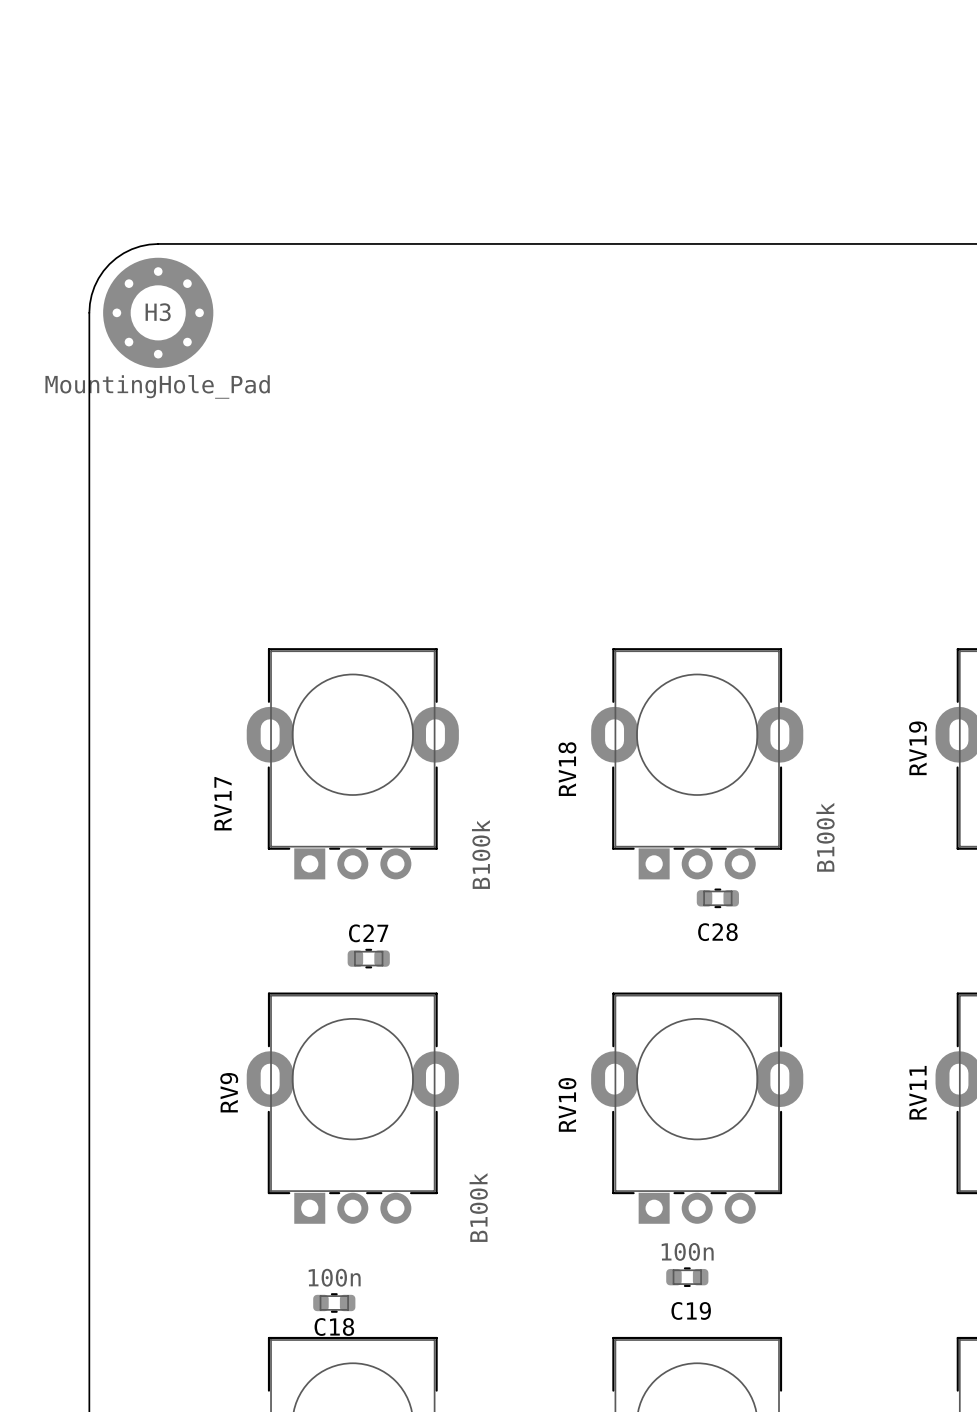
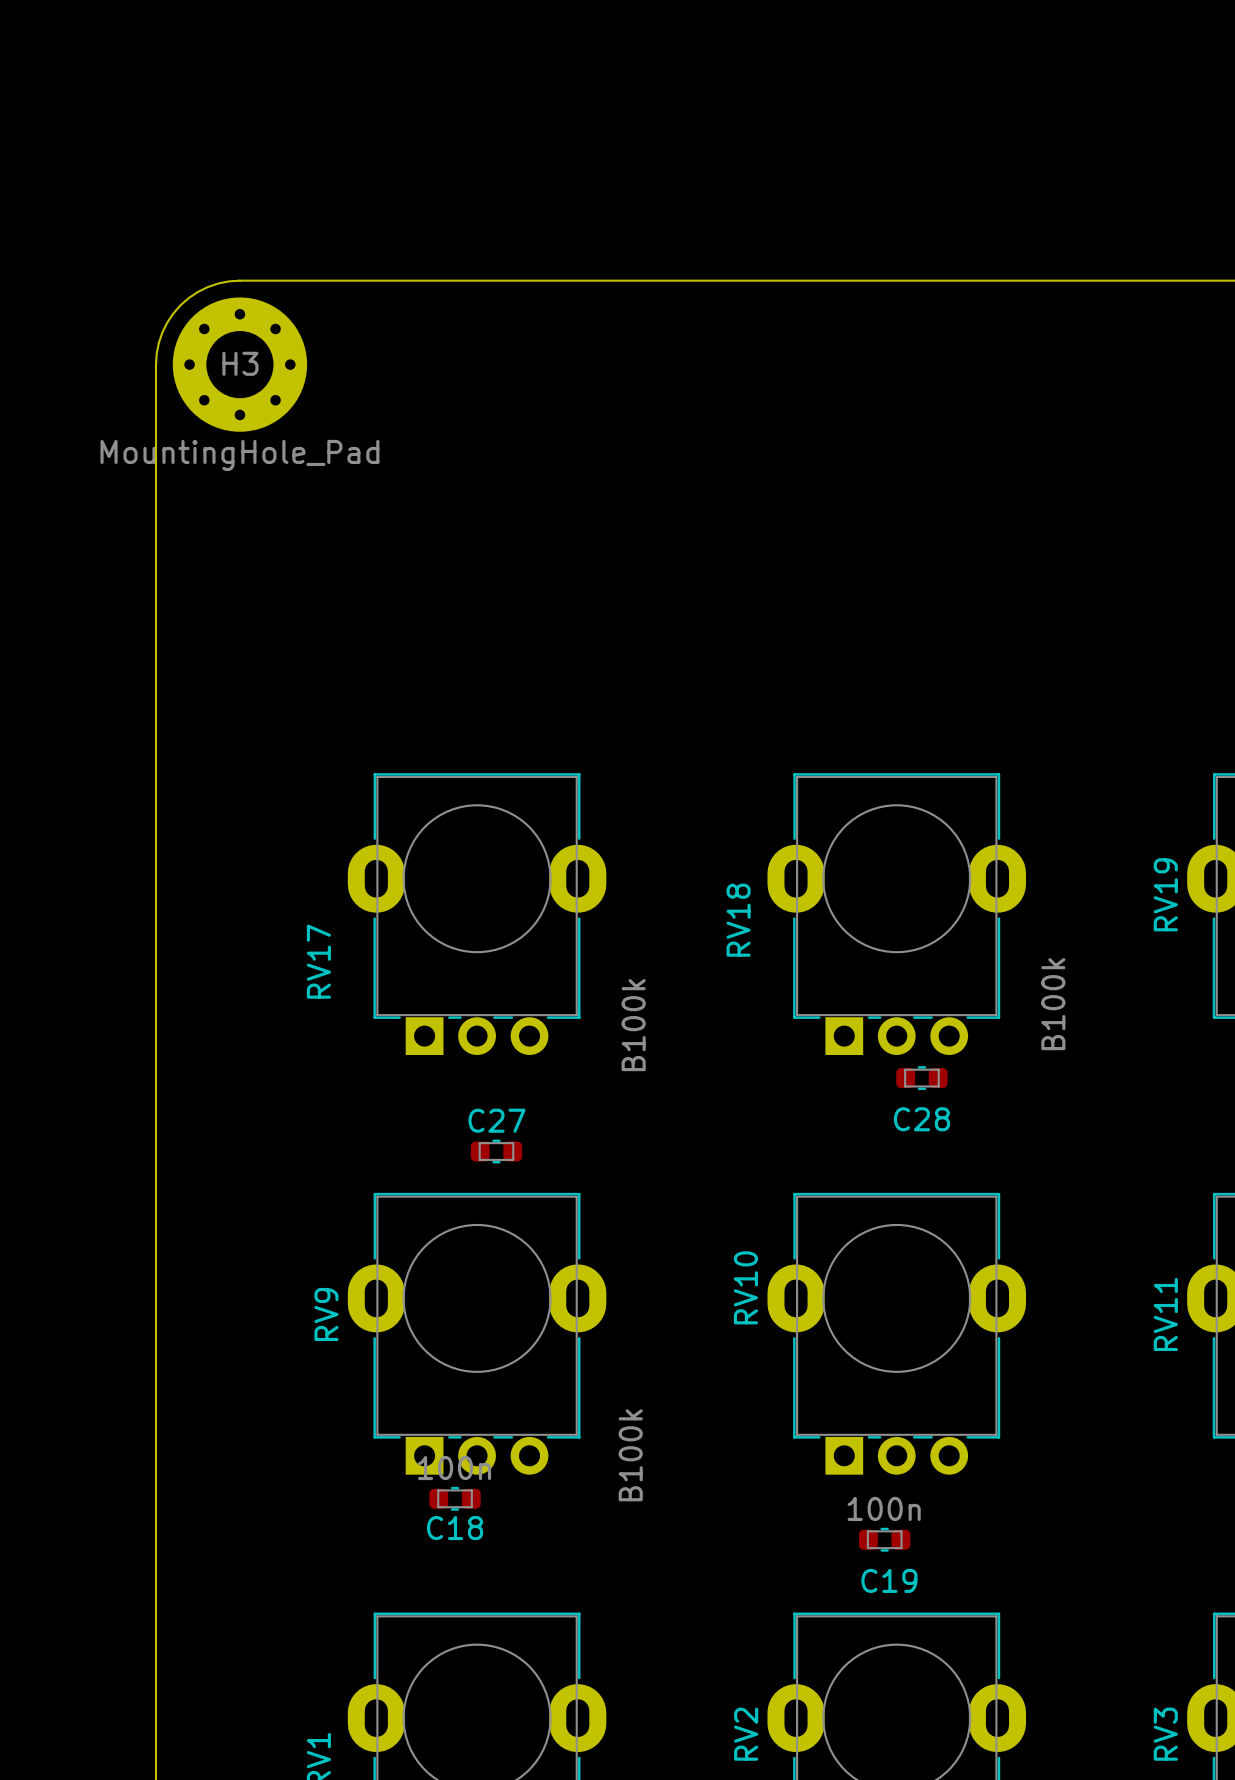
RV10 name position: RV10 (567, 1104) -> RV10 (745, 1287)
C18 position: (334, 1302) -> (455, 1498)

